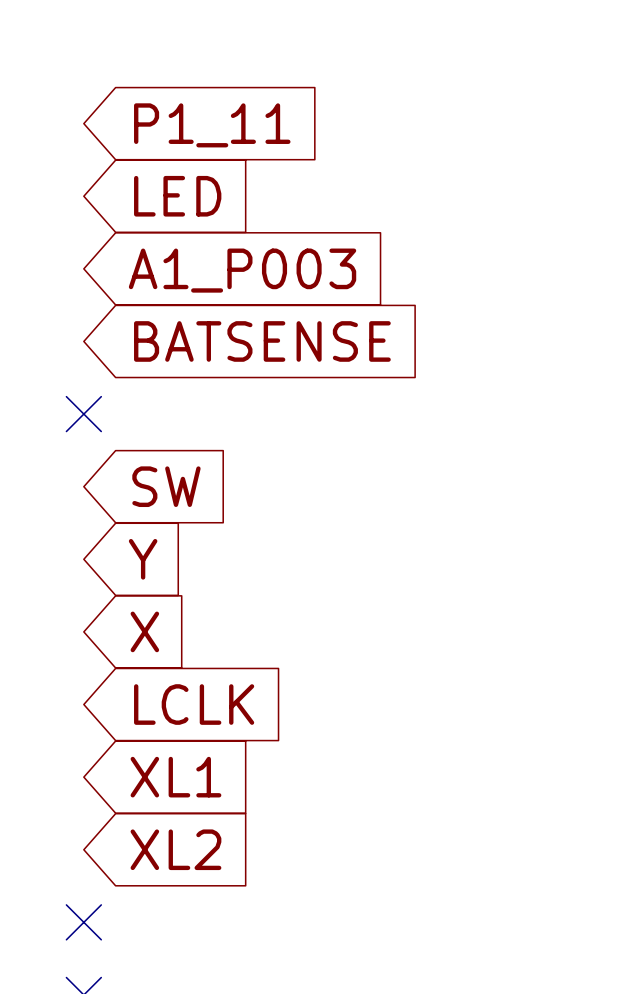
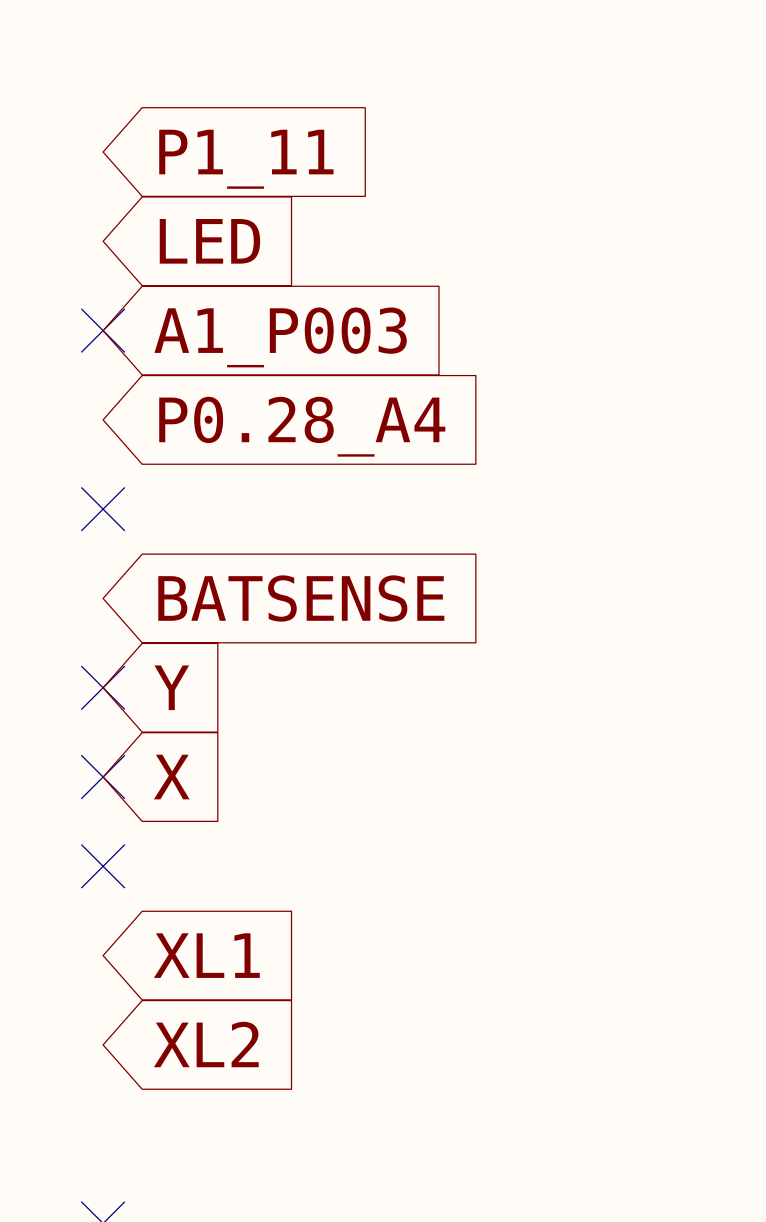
no-connect mark: none -> (103, 330)
global label: BATSENSE (262, 341) -> P0.28_A4 (302, 426)
global label: SW (166, 486) -> BATSENSE (301, 598)
no-connect mark: none -> (103, 687)
no-connect mark: none -> (103, 777)
no-connect mark: none -> (103, 866)
global label: LCLK (194, 704) -> none
no-connect mark: (83, 922) -> none

